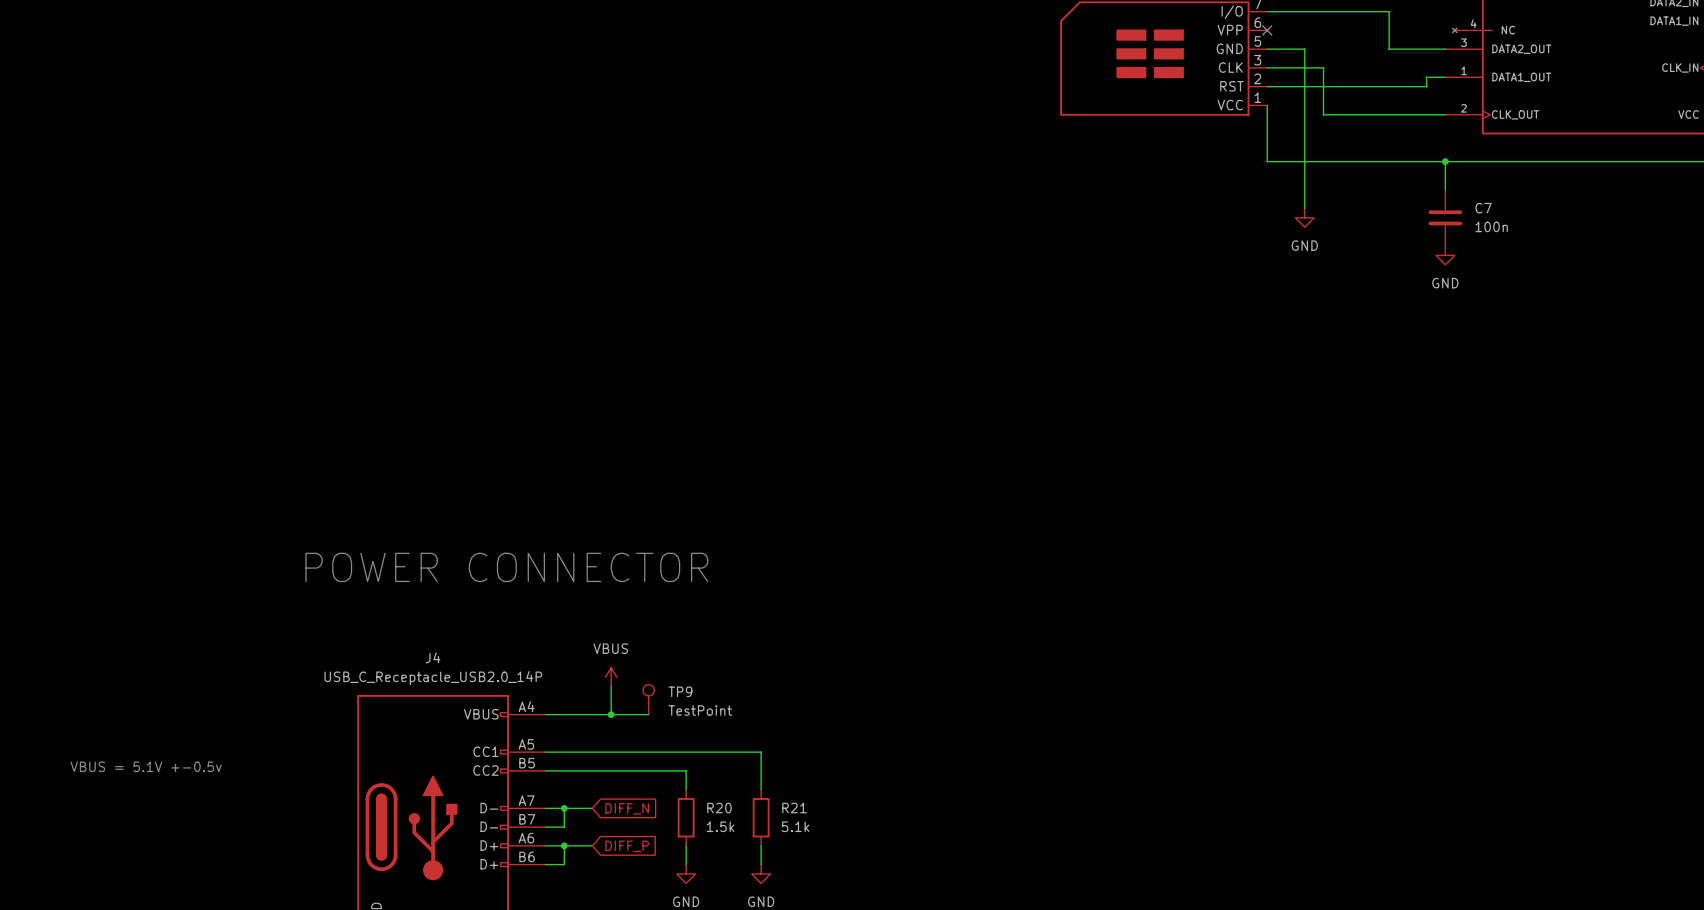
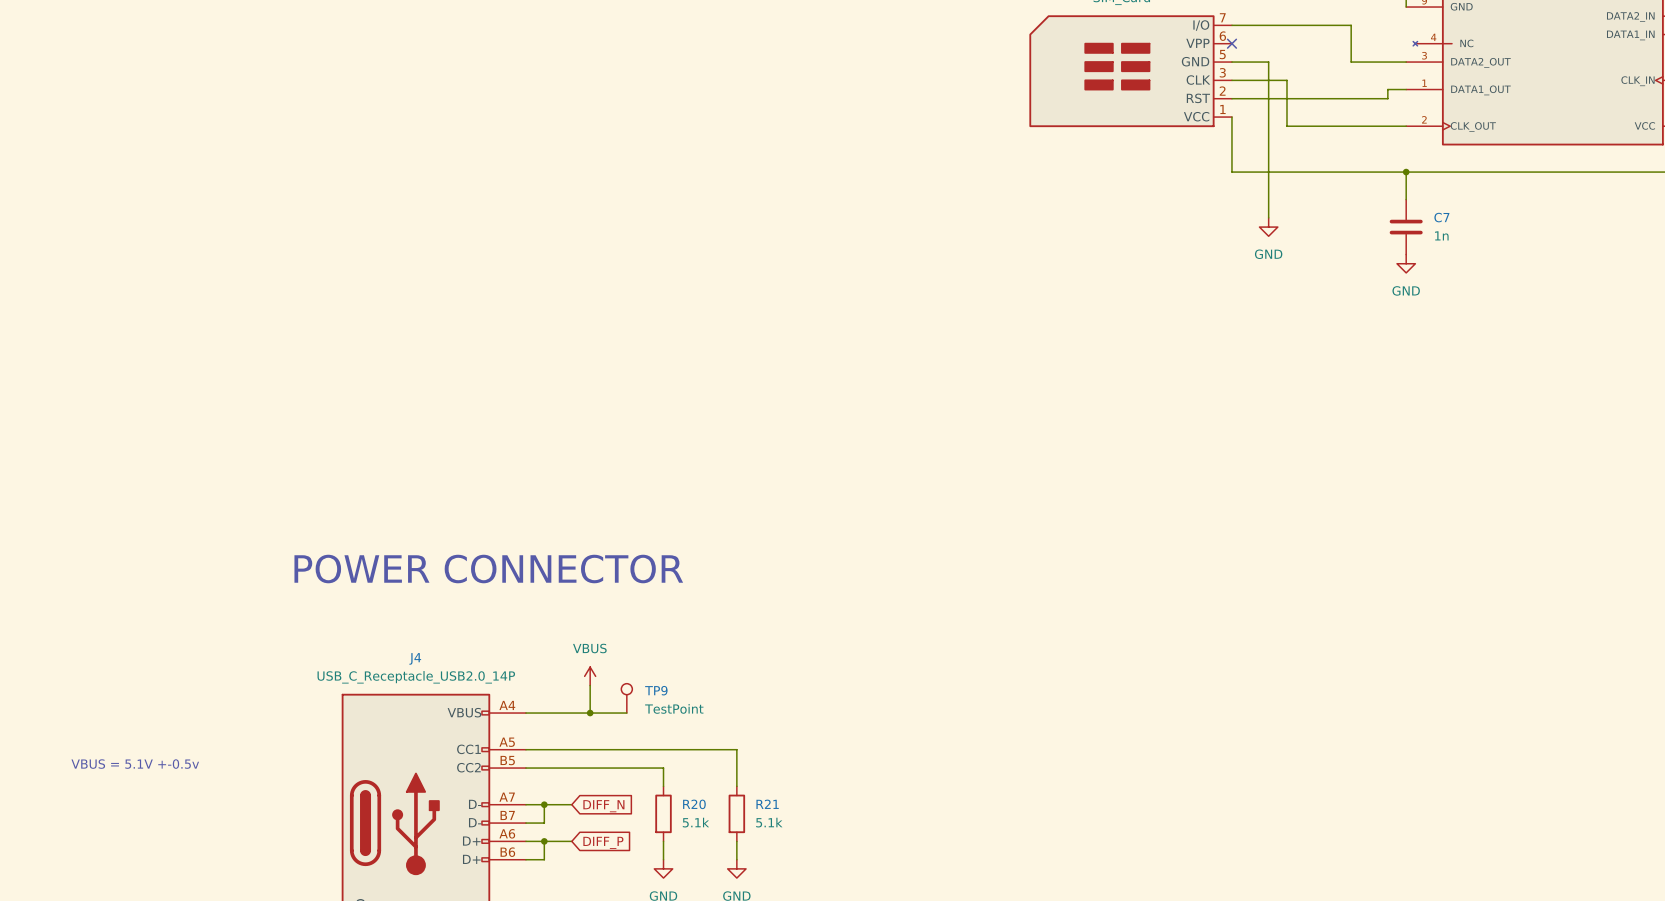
C7 value: 100n (1491, 226) -> 1n (1441, 235)
R20 value: 1.5k (720, 826) -> 5.1k (695, 822)

